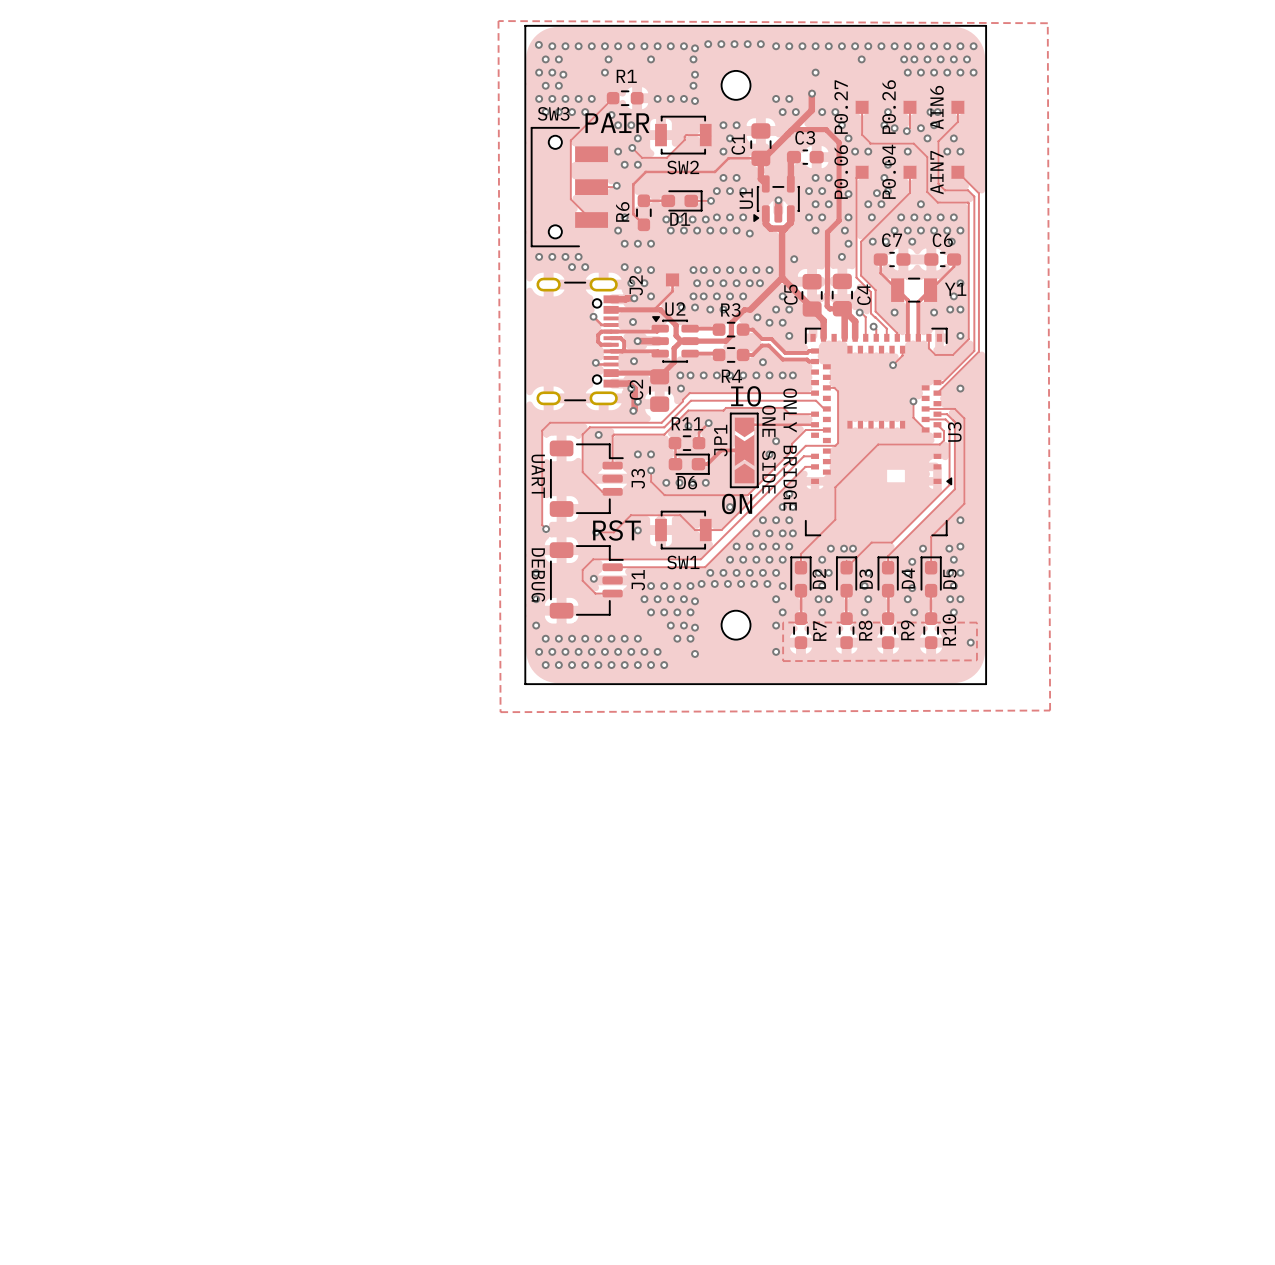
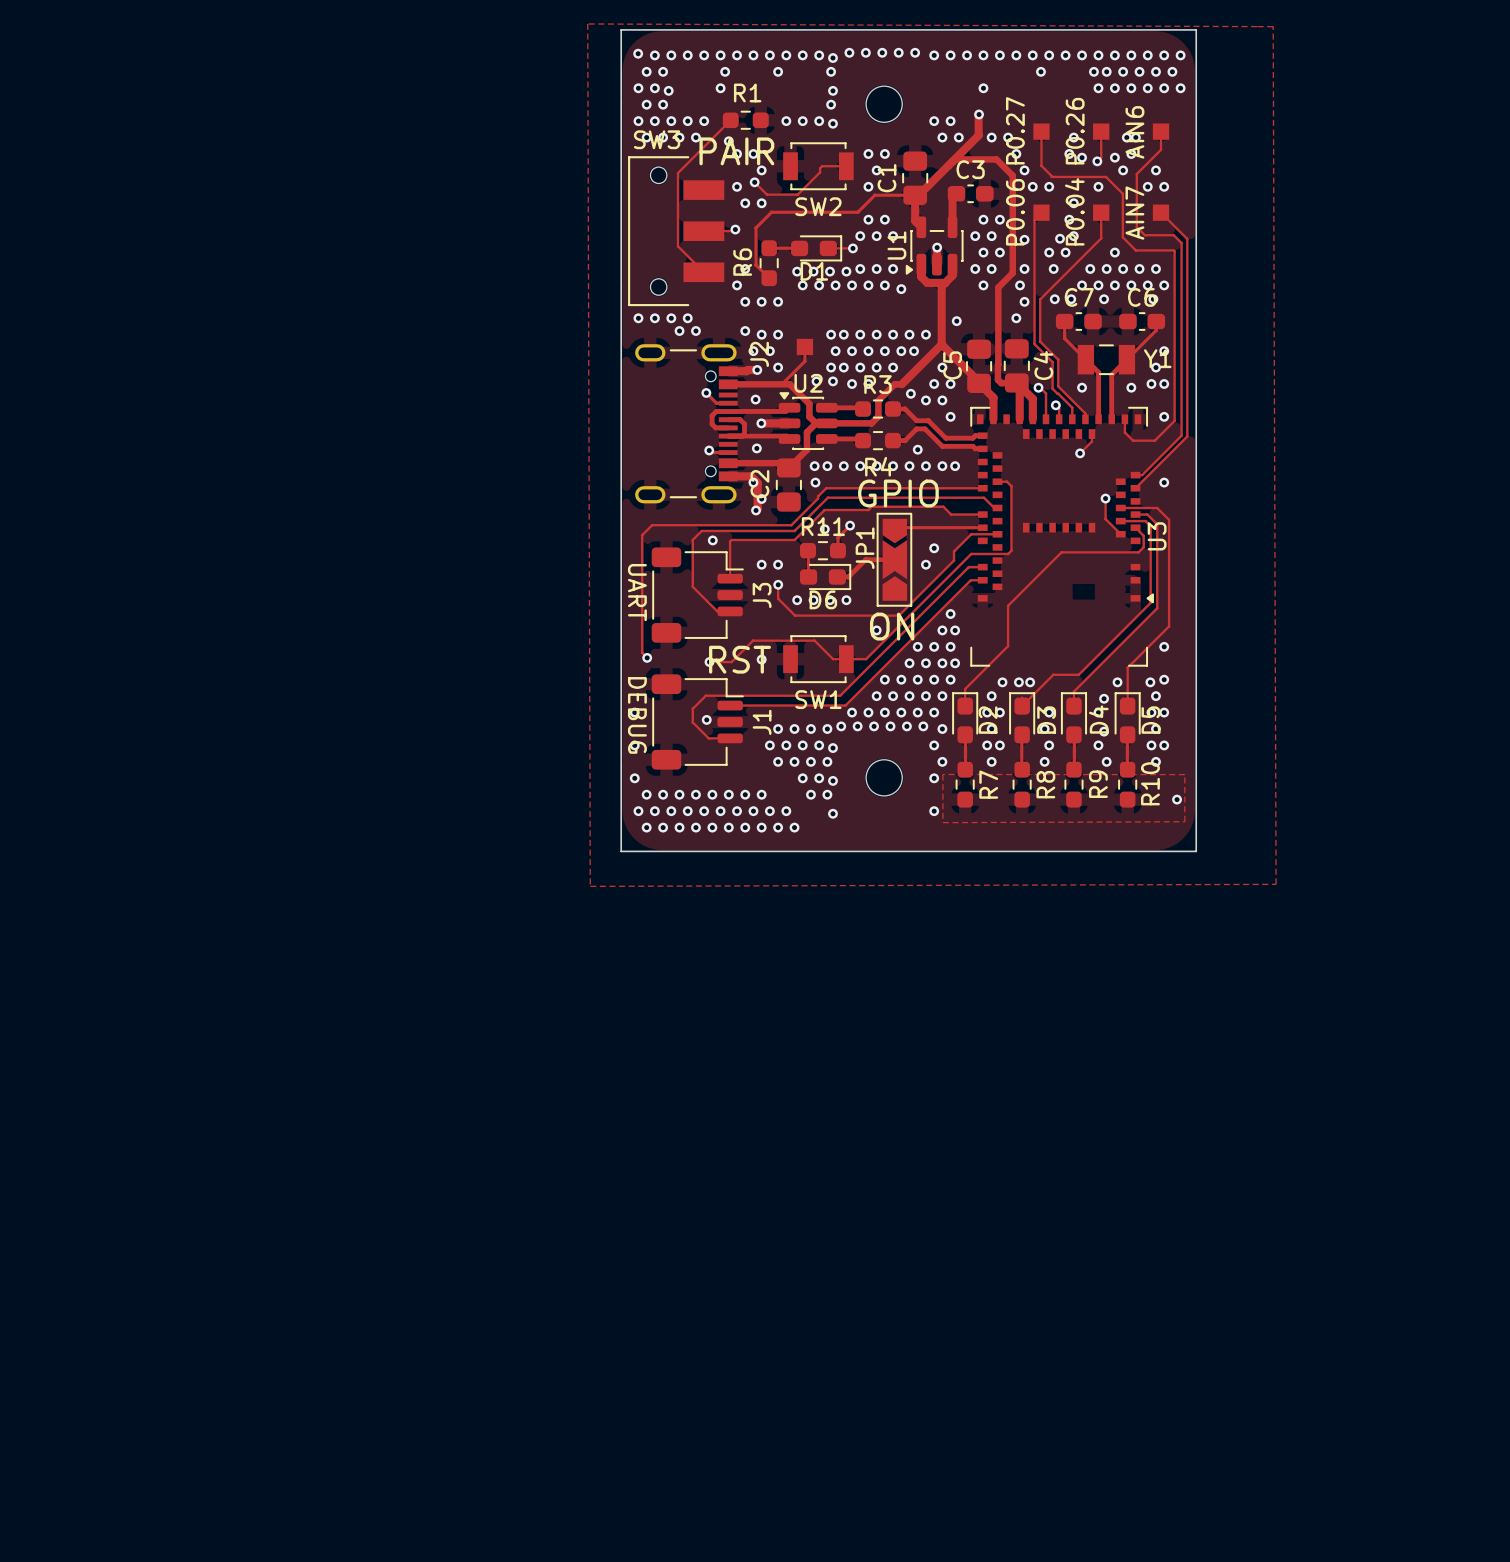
text: IO (746, 396) -> GPIO (898, 493)
text: ONE SIDE (768, 449) -> none
text: ONLY BRIDGE (790, 449) -> none

